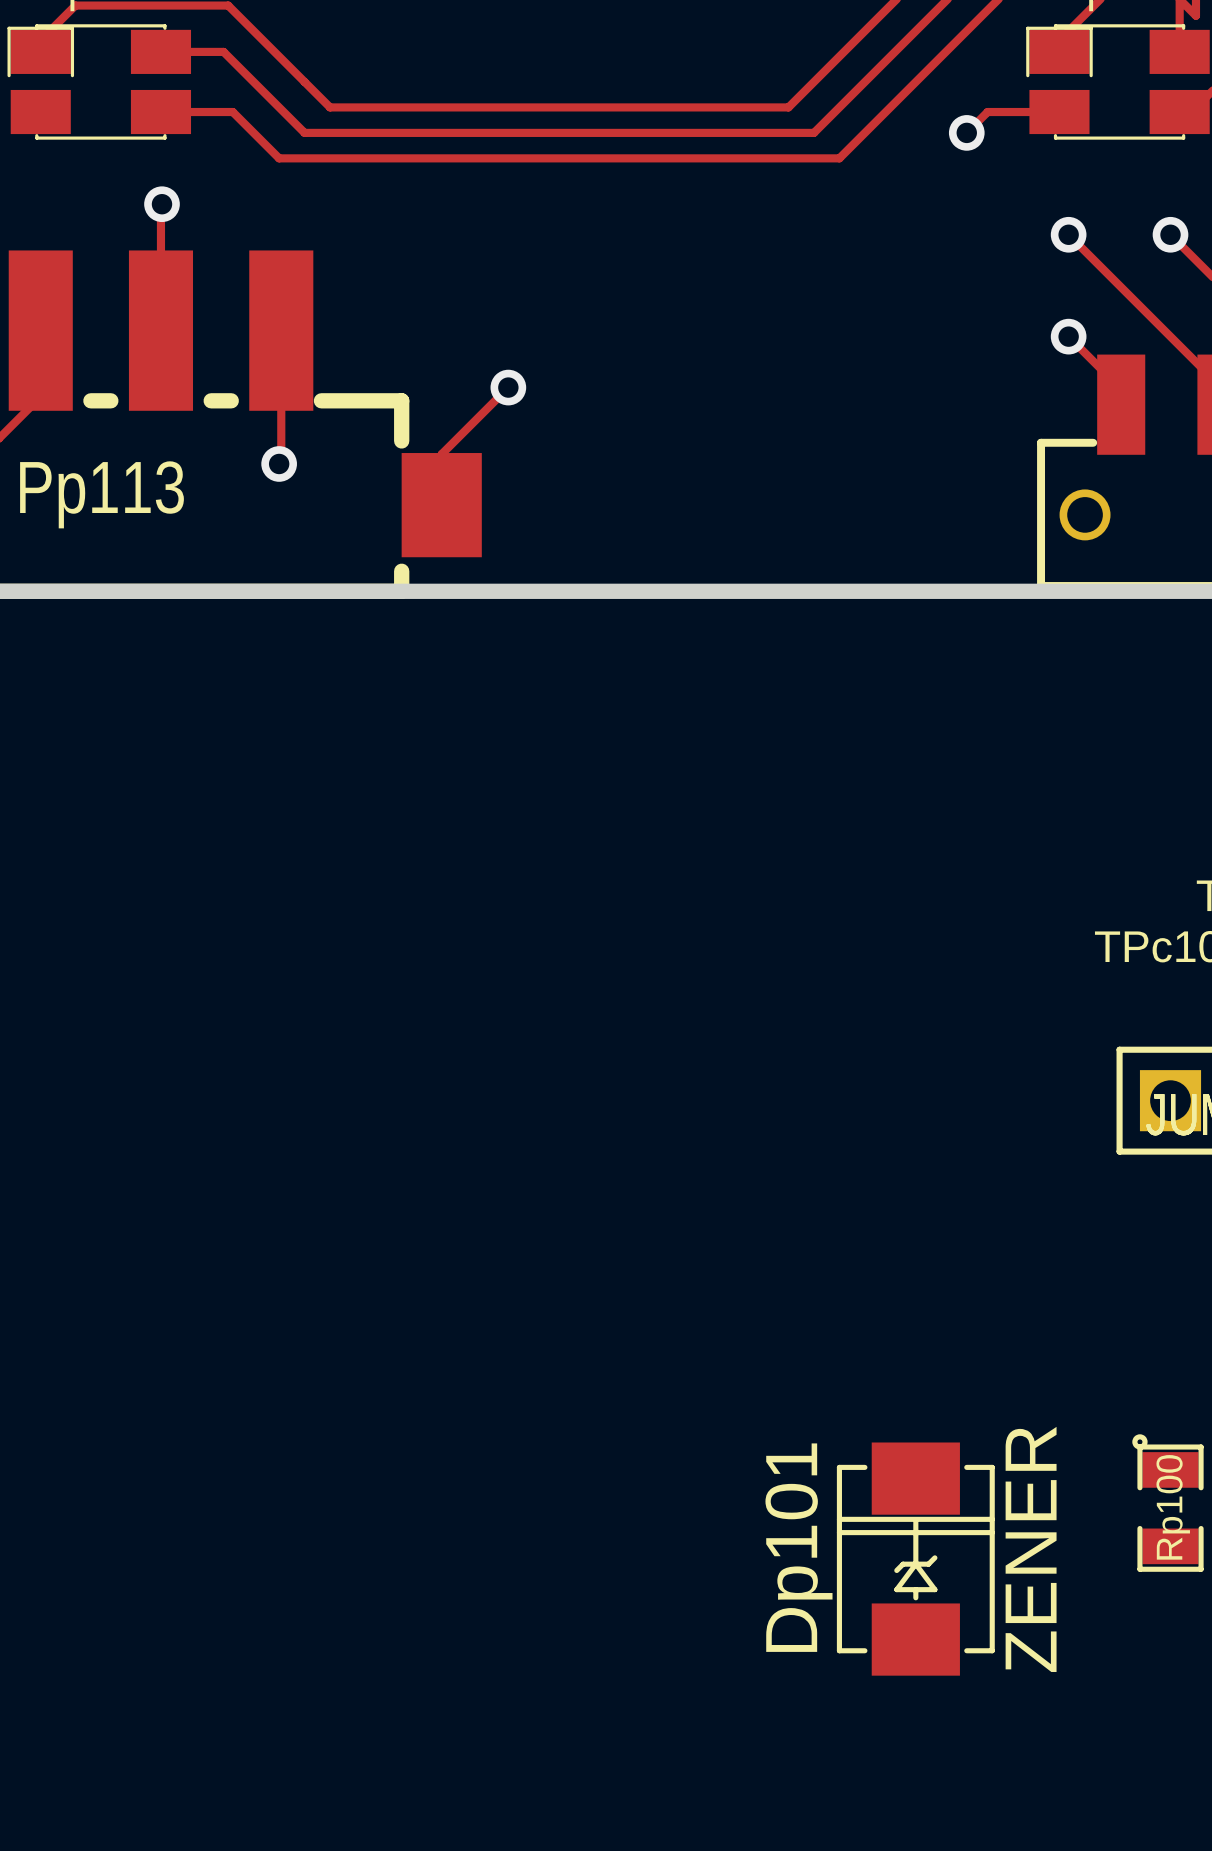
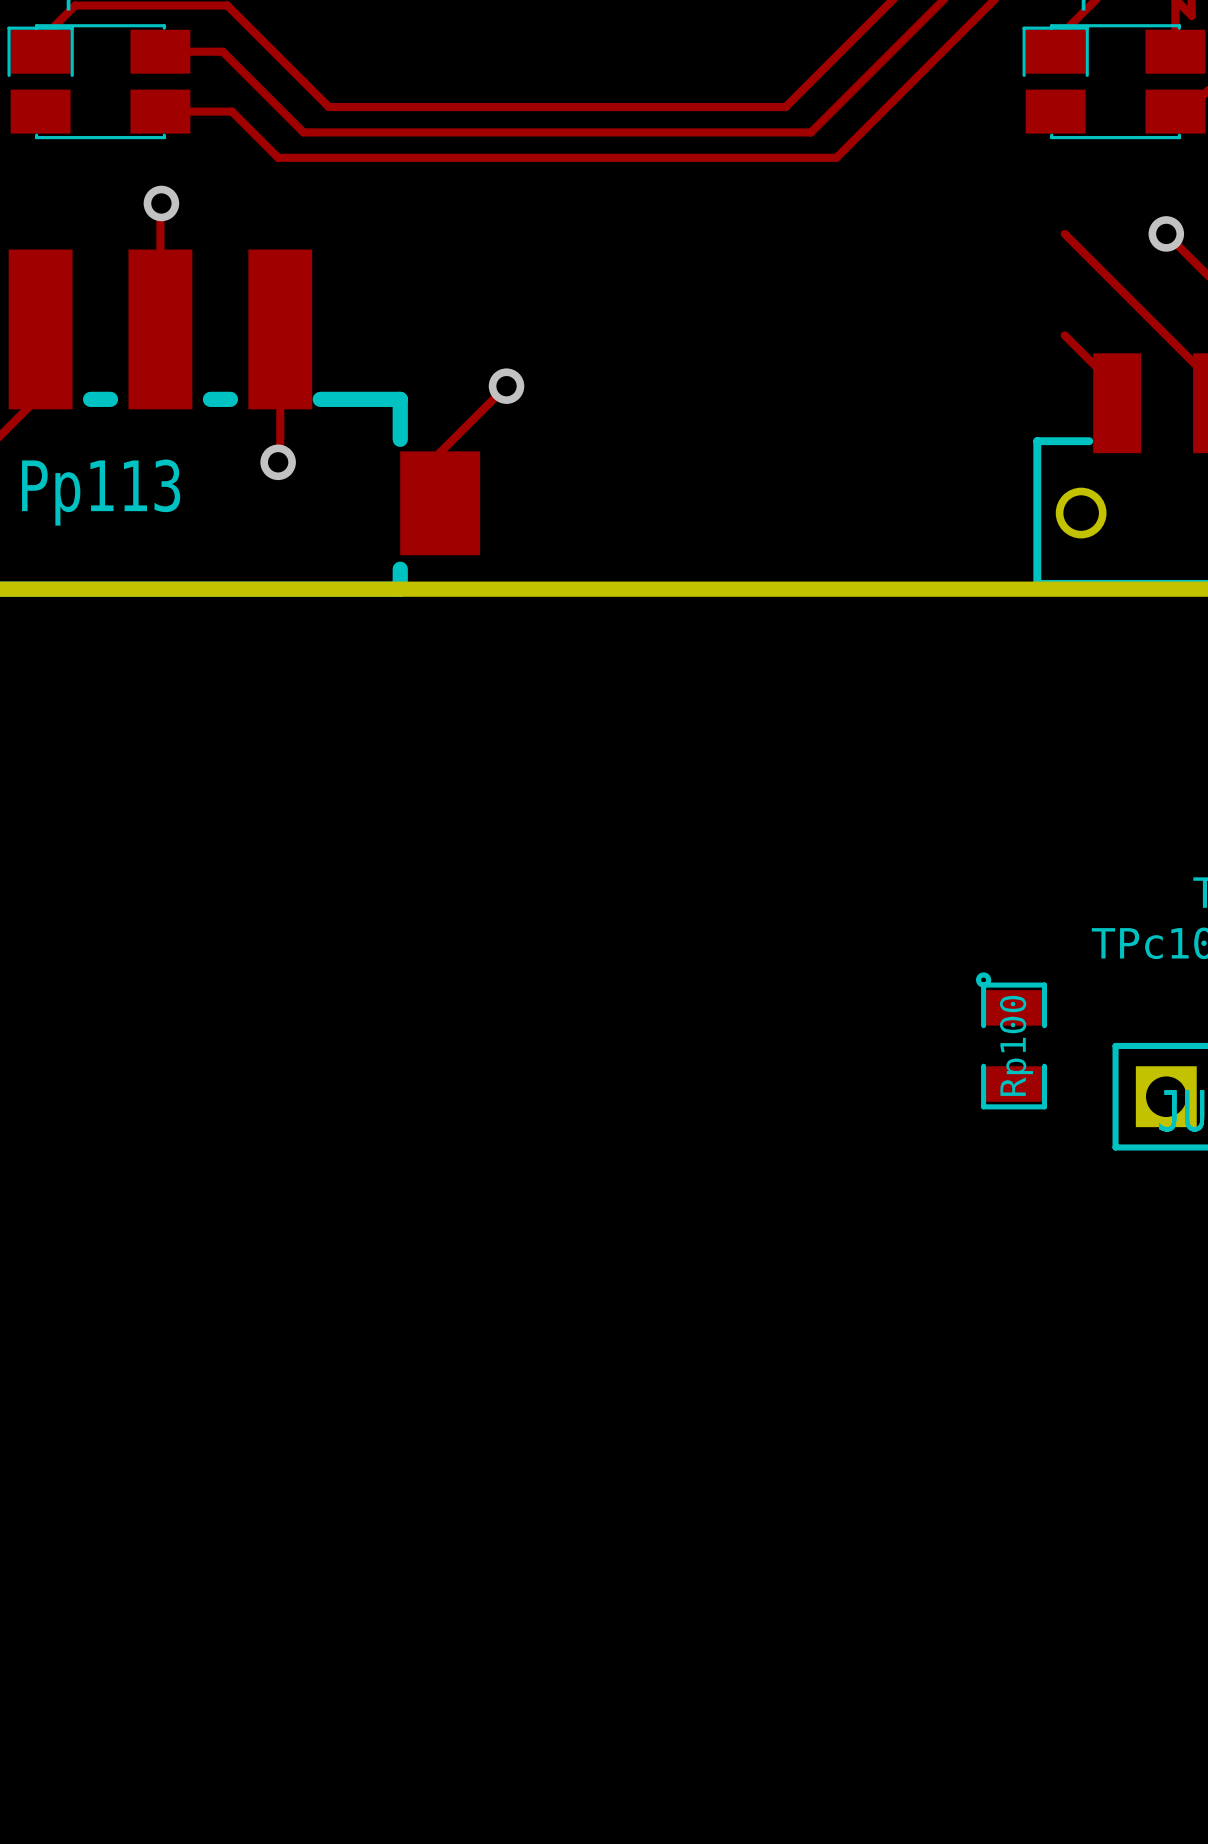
track: (1059, 112) (987, 112) (966, 132) -> none
via: (966, 132) -> none
via: (1068, 234) -> none
via: (1068, 336) -> none
Rp100 position: (1167, 1503) -> (1011, 1040)
Dp101: ZENER (915, 1559) -> none

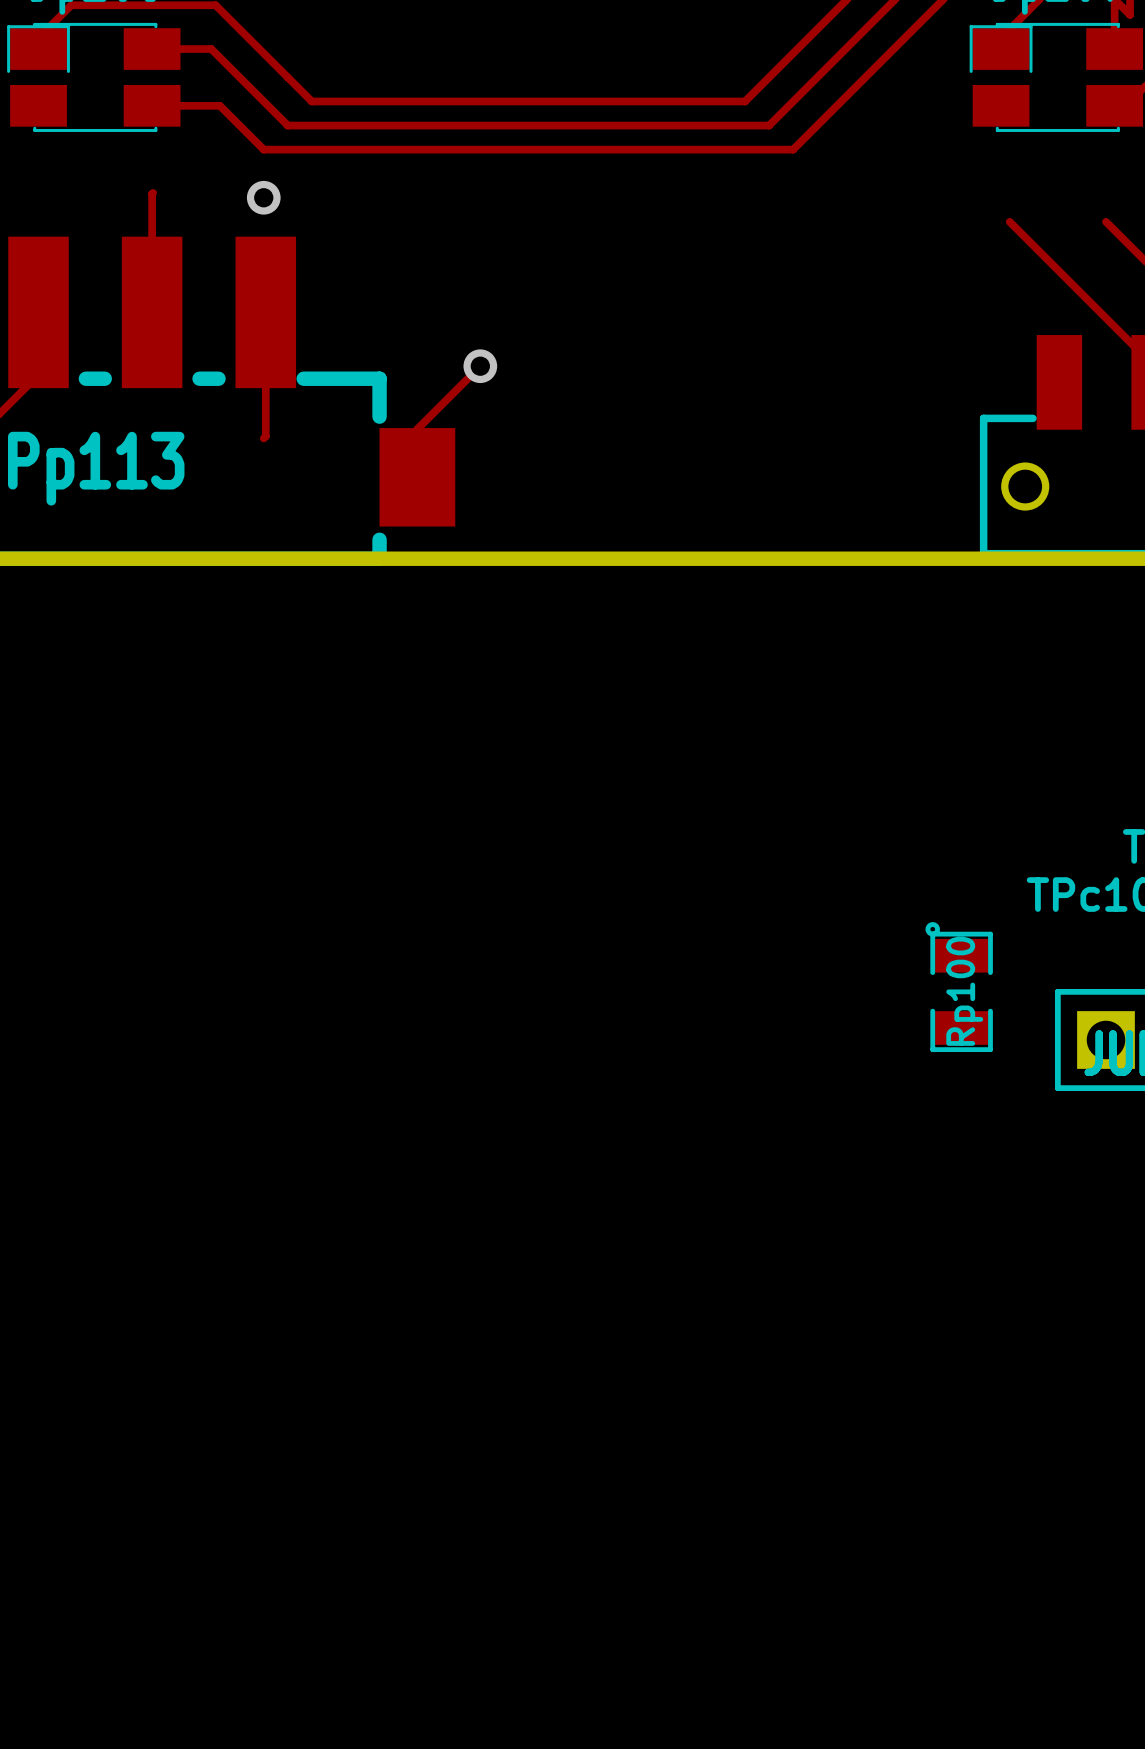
via position: (161, 203) -> (263, 197)
via: (1166, 233) -> none
track: (1064, 335) (1117, 387) (1117, 403) -> none
via: (278, 462) -> none

